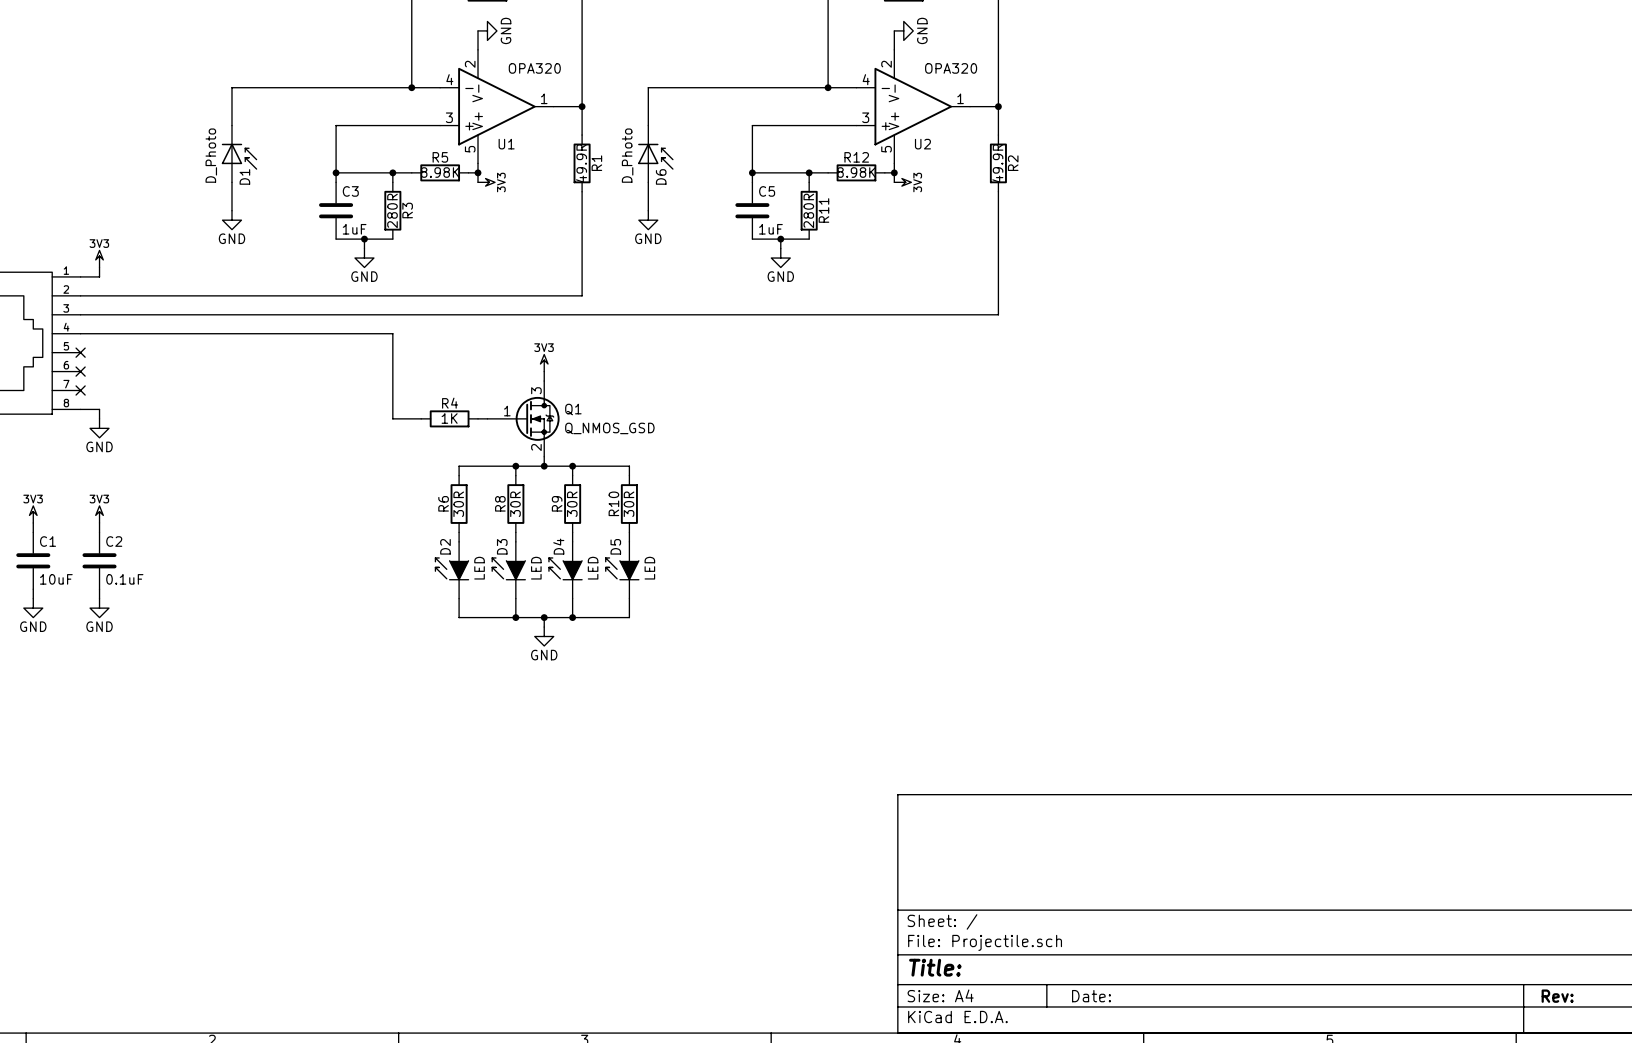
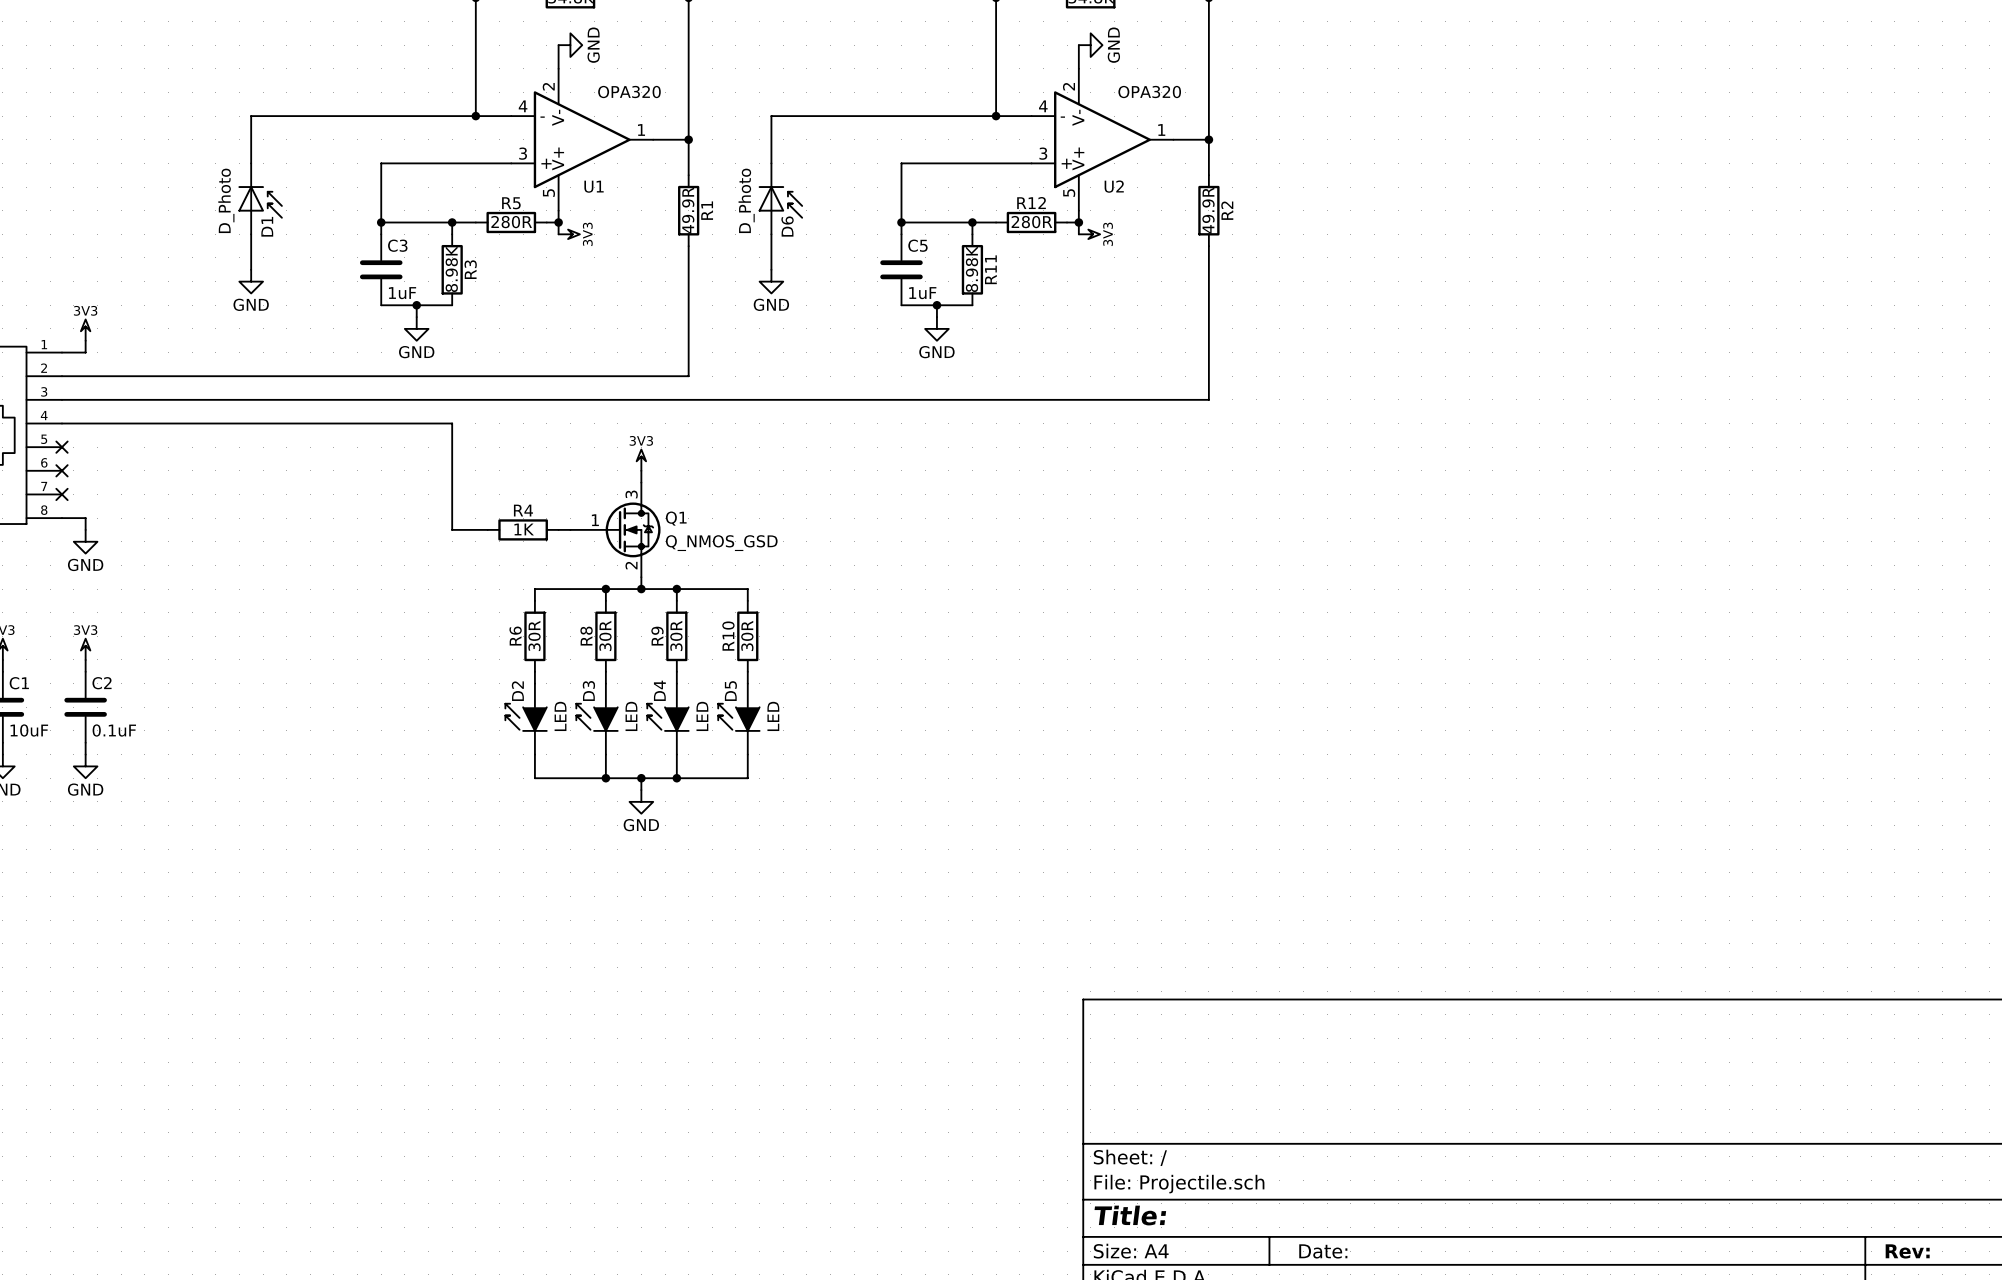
R5 value: 8.98K (440, 172) -> 280R (511, 222)
R12 value: 8.98K (856, 172) -> 280R (1031, 222)
R3 value: 280R (392, 210) -> 8.98K (451, 269)
R11 value: 280R (808, 210) -> 8.98K (972, 269)

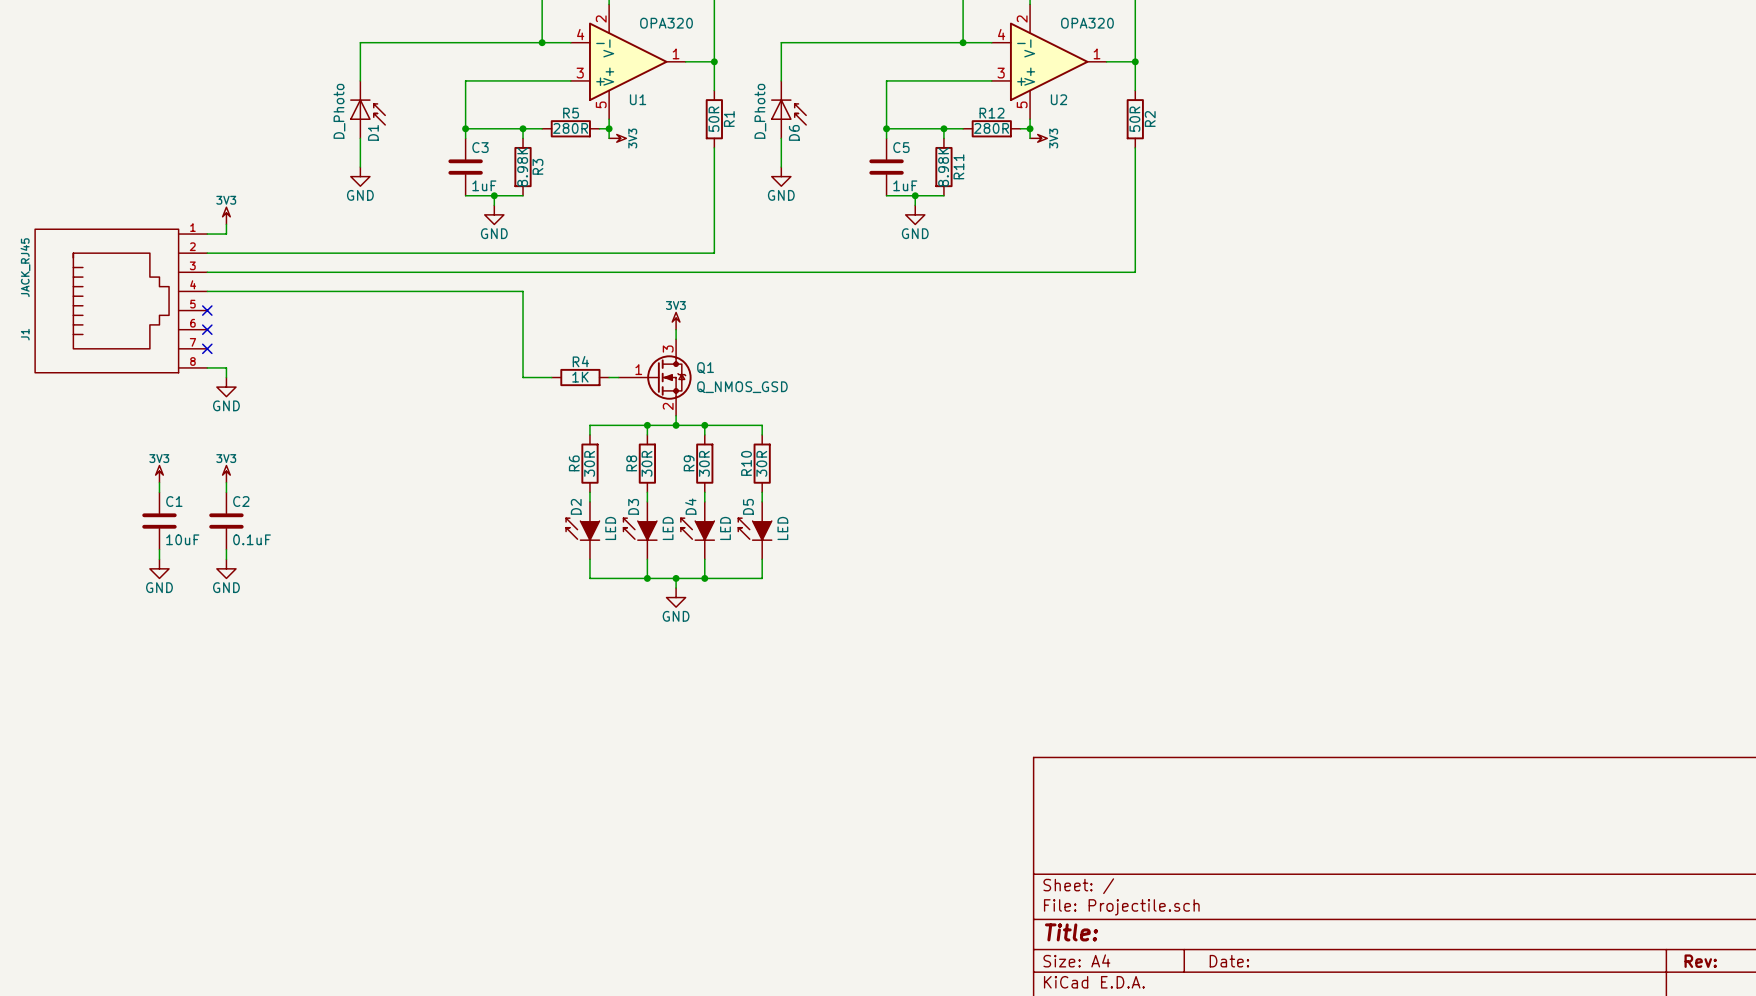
R1 value: 49.9R (688, 210) -> 50R (713, 119)
R2 value: 49.9R (1208, 210) -> 50R (1134, 119)

